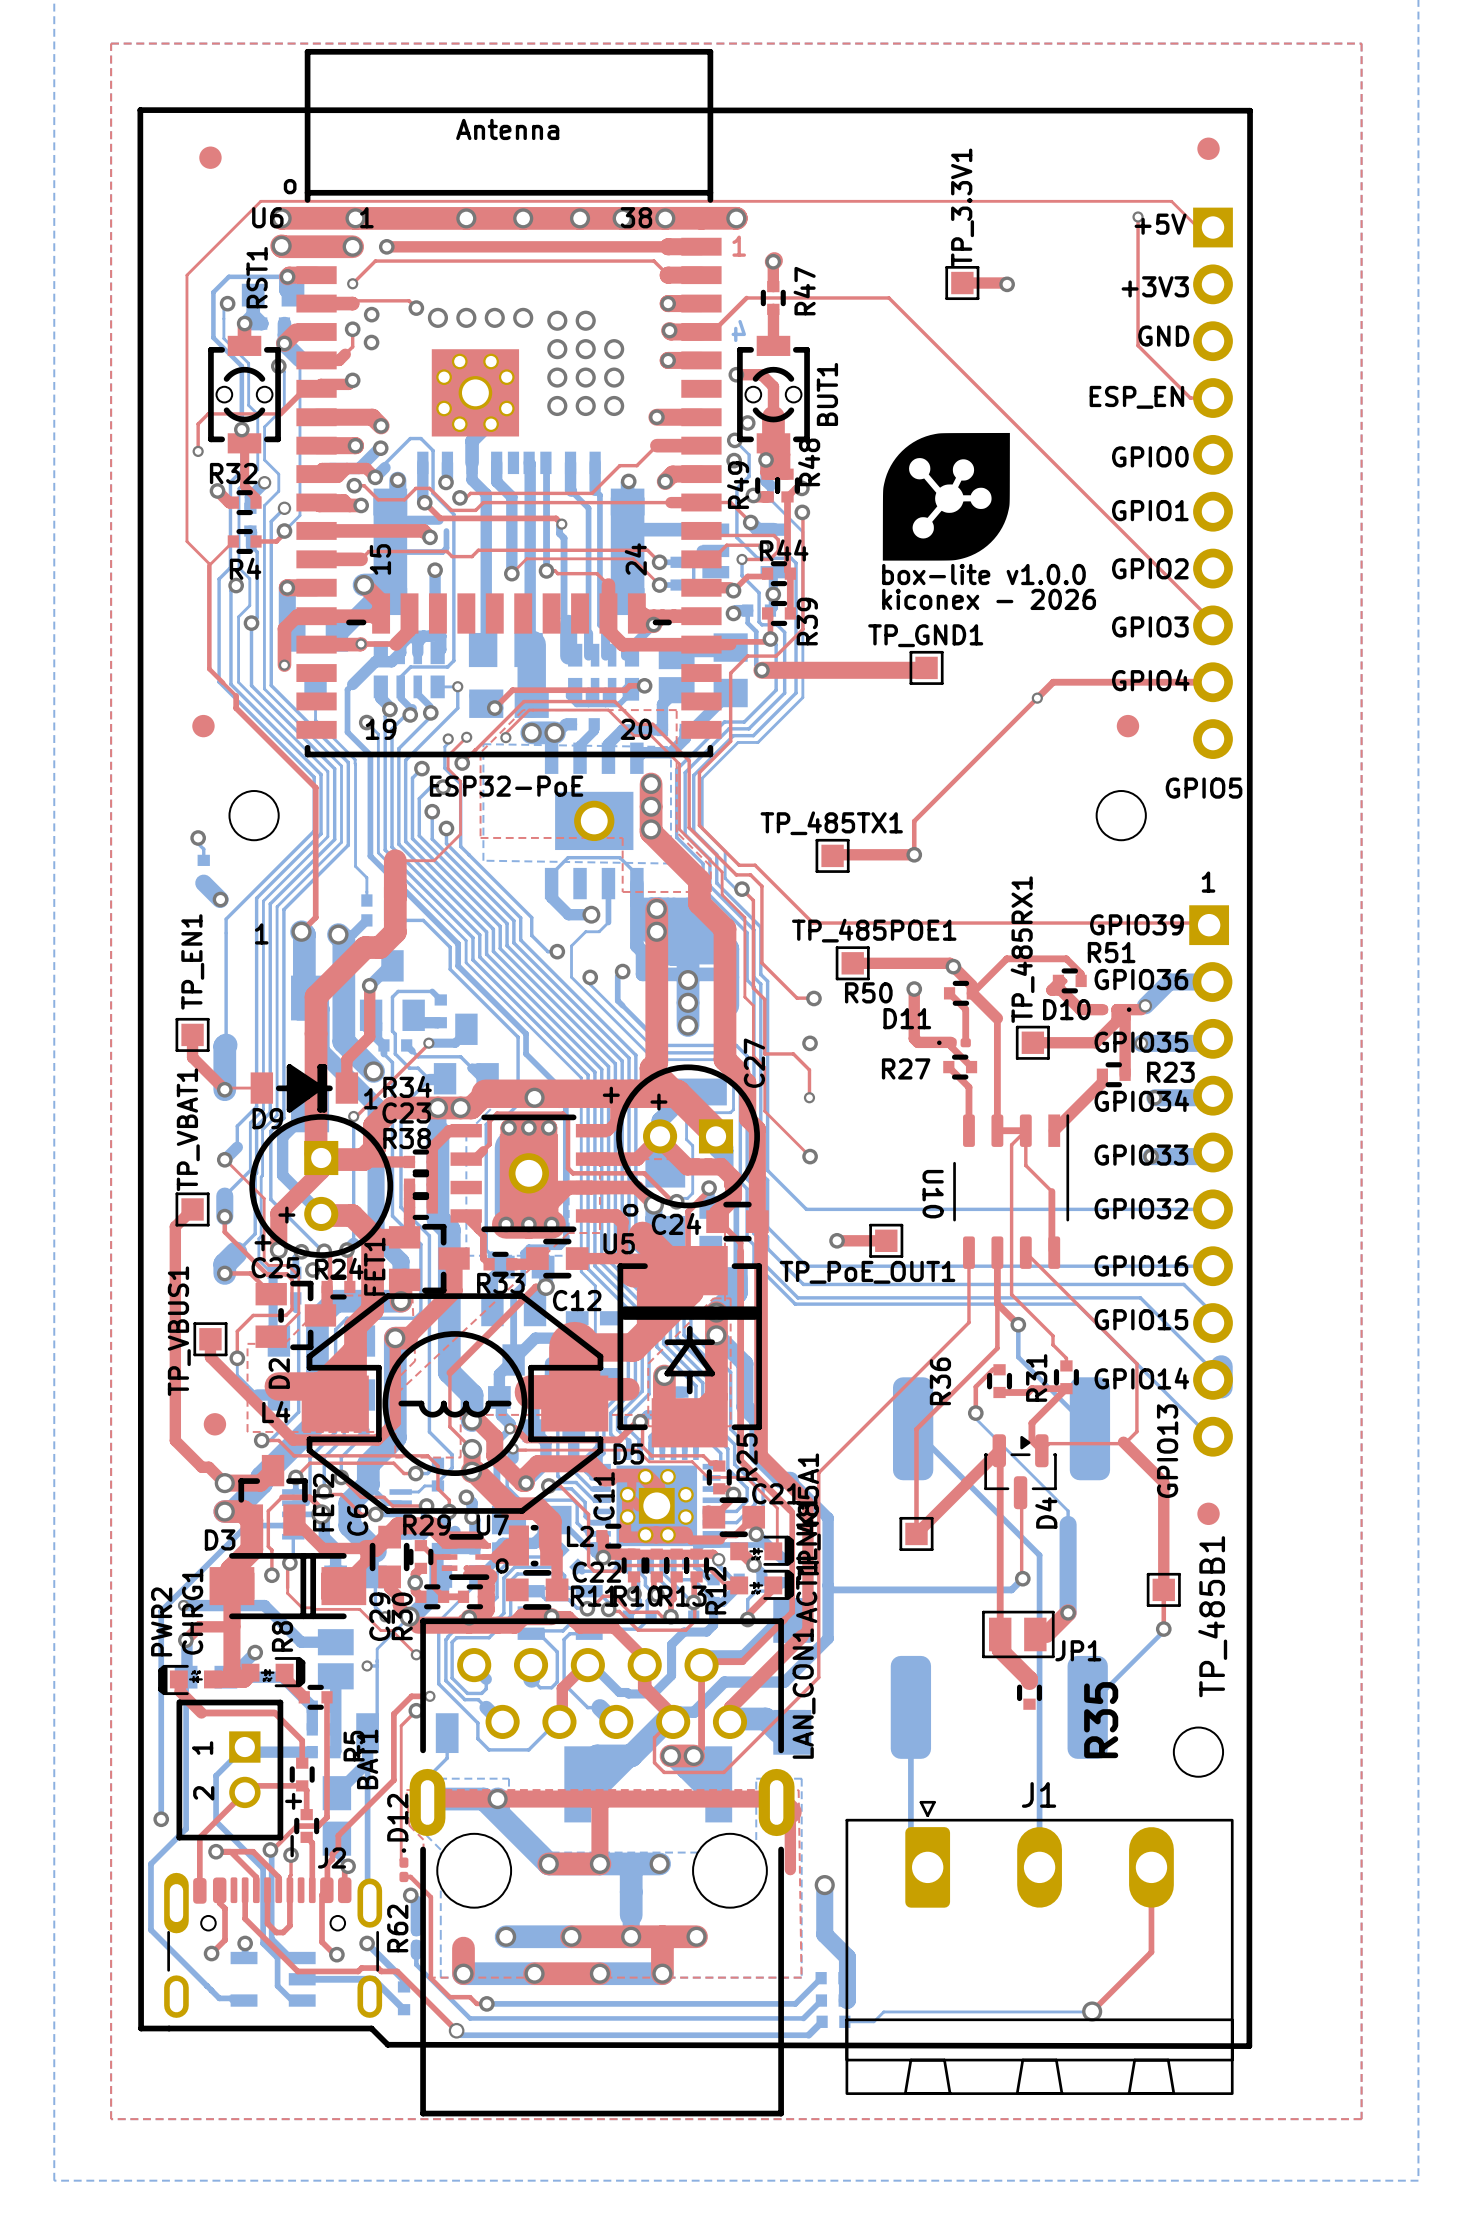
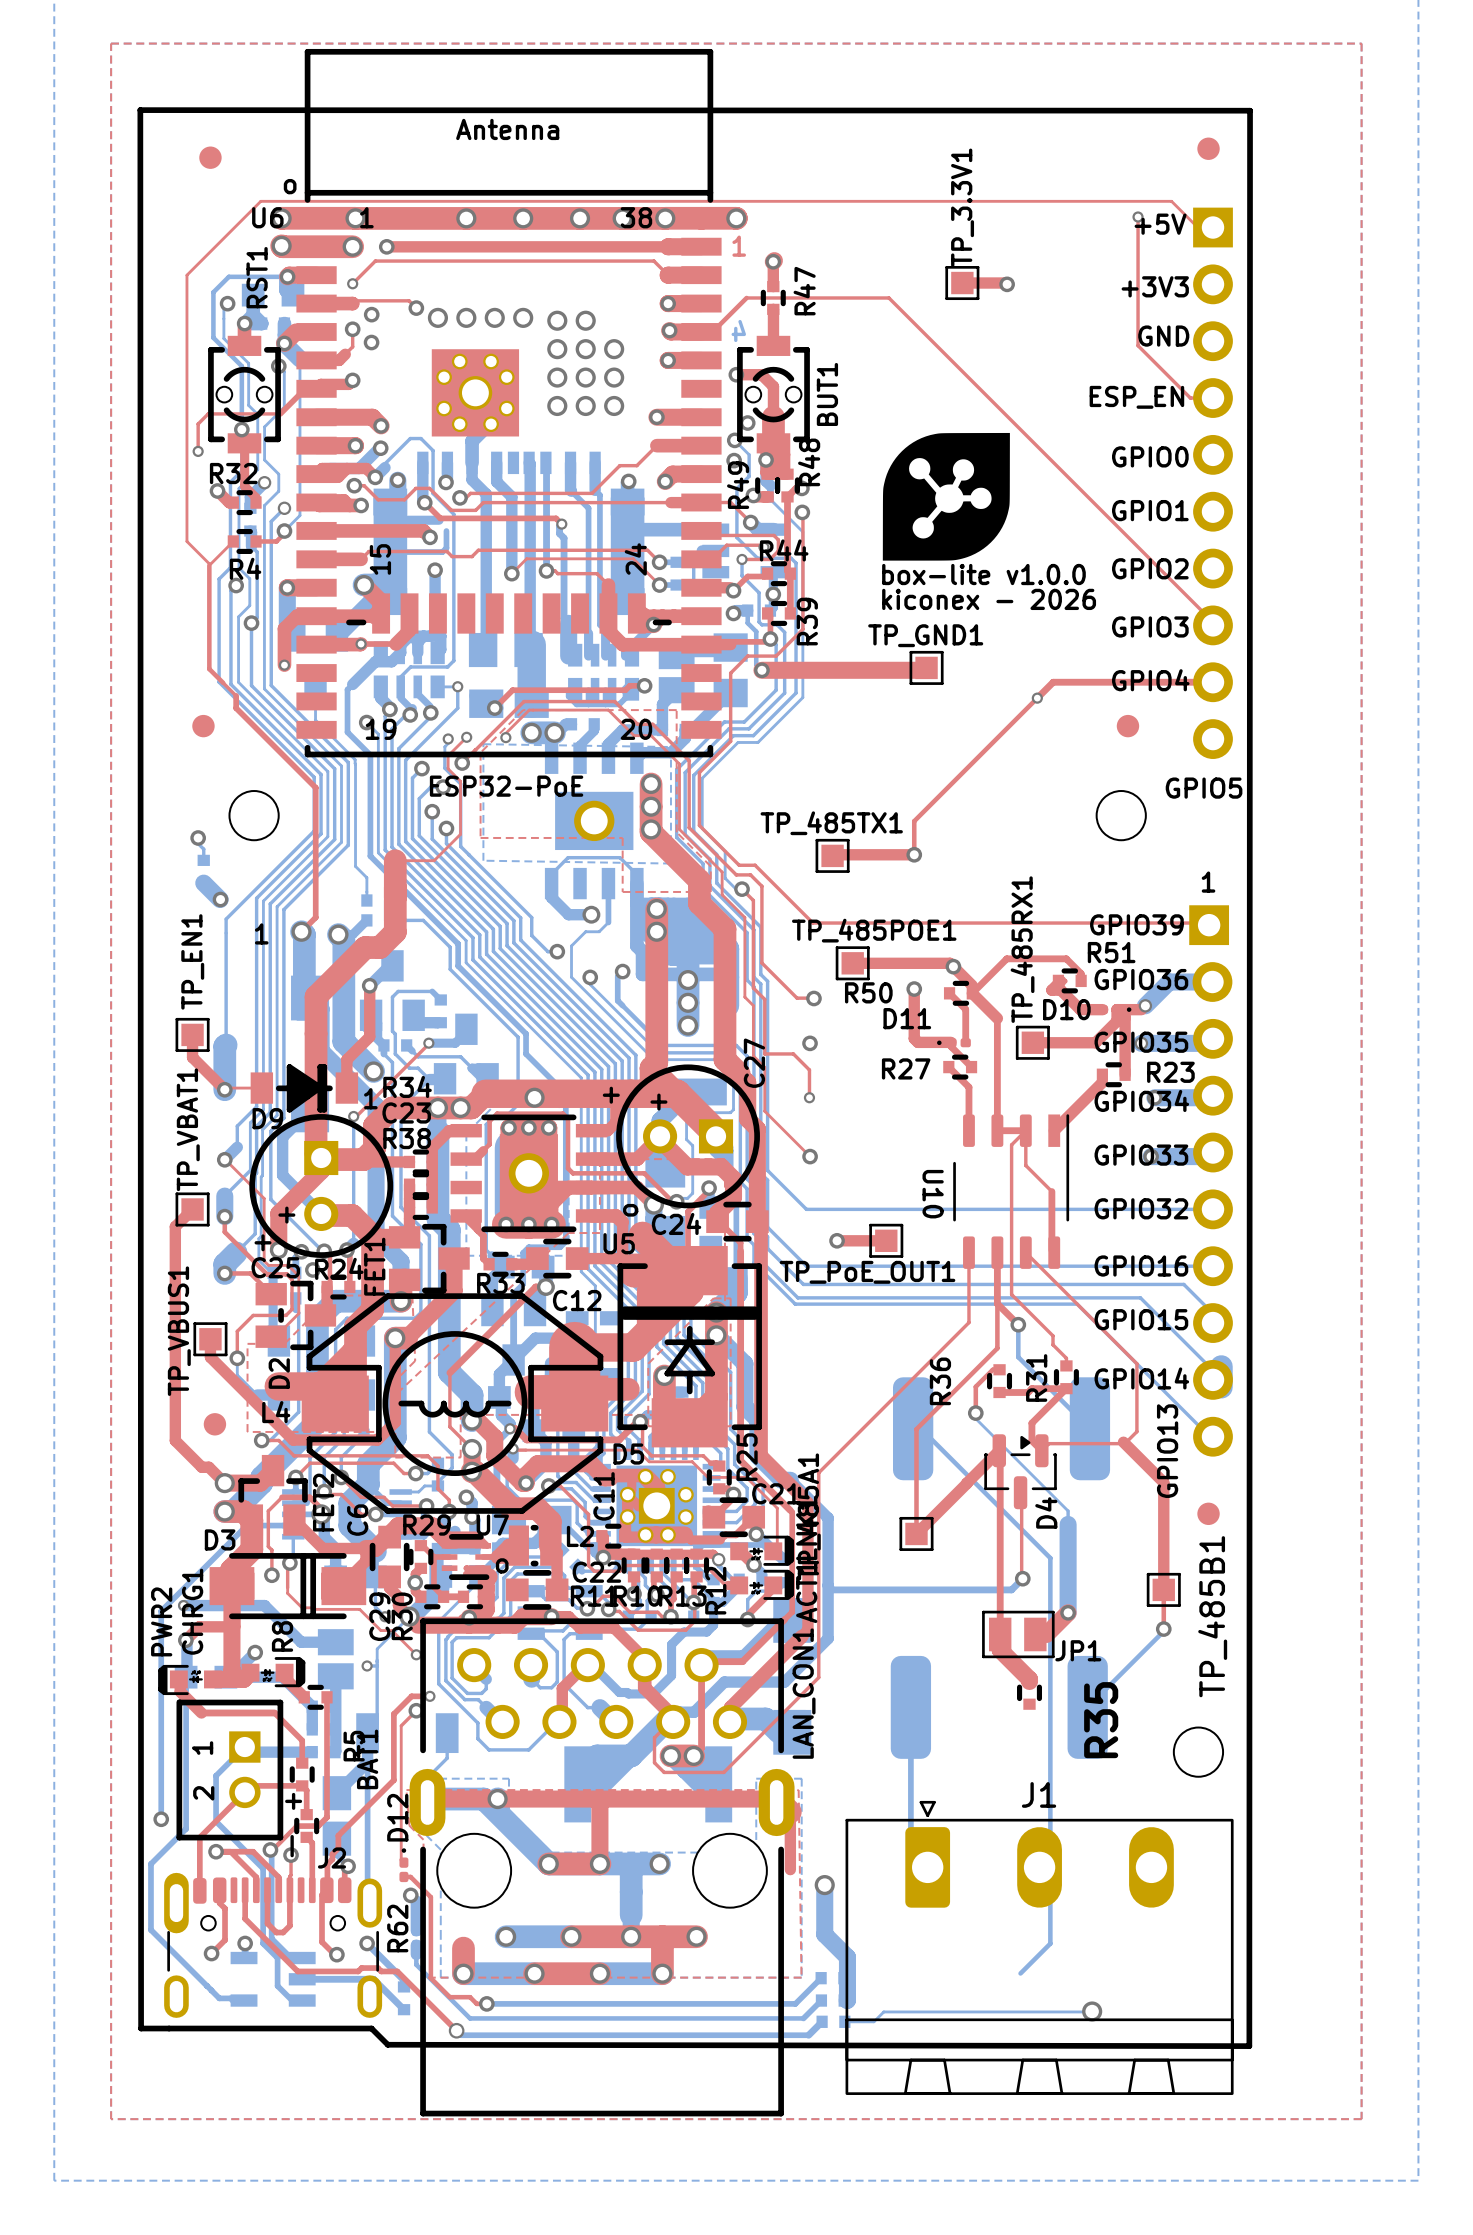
bottom track: (913, 1428) (1039, 1555) (1039, 1867) -> (913, 1428) (921, 1428) (1050, 1558) (1050, 1943) (1020, 1973)
top track: (1151, 1867) (1151, 1952) (1092, 2011) -> none

